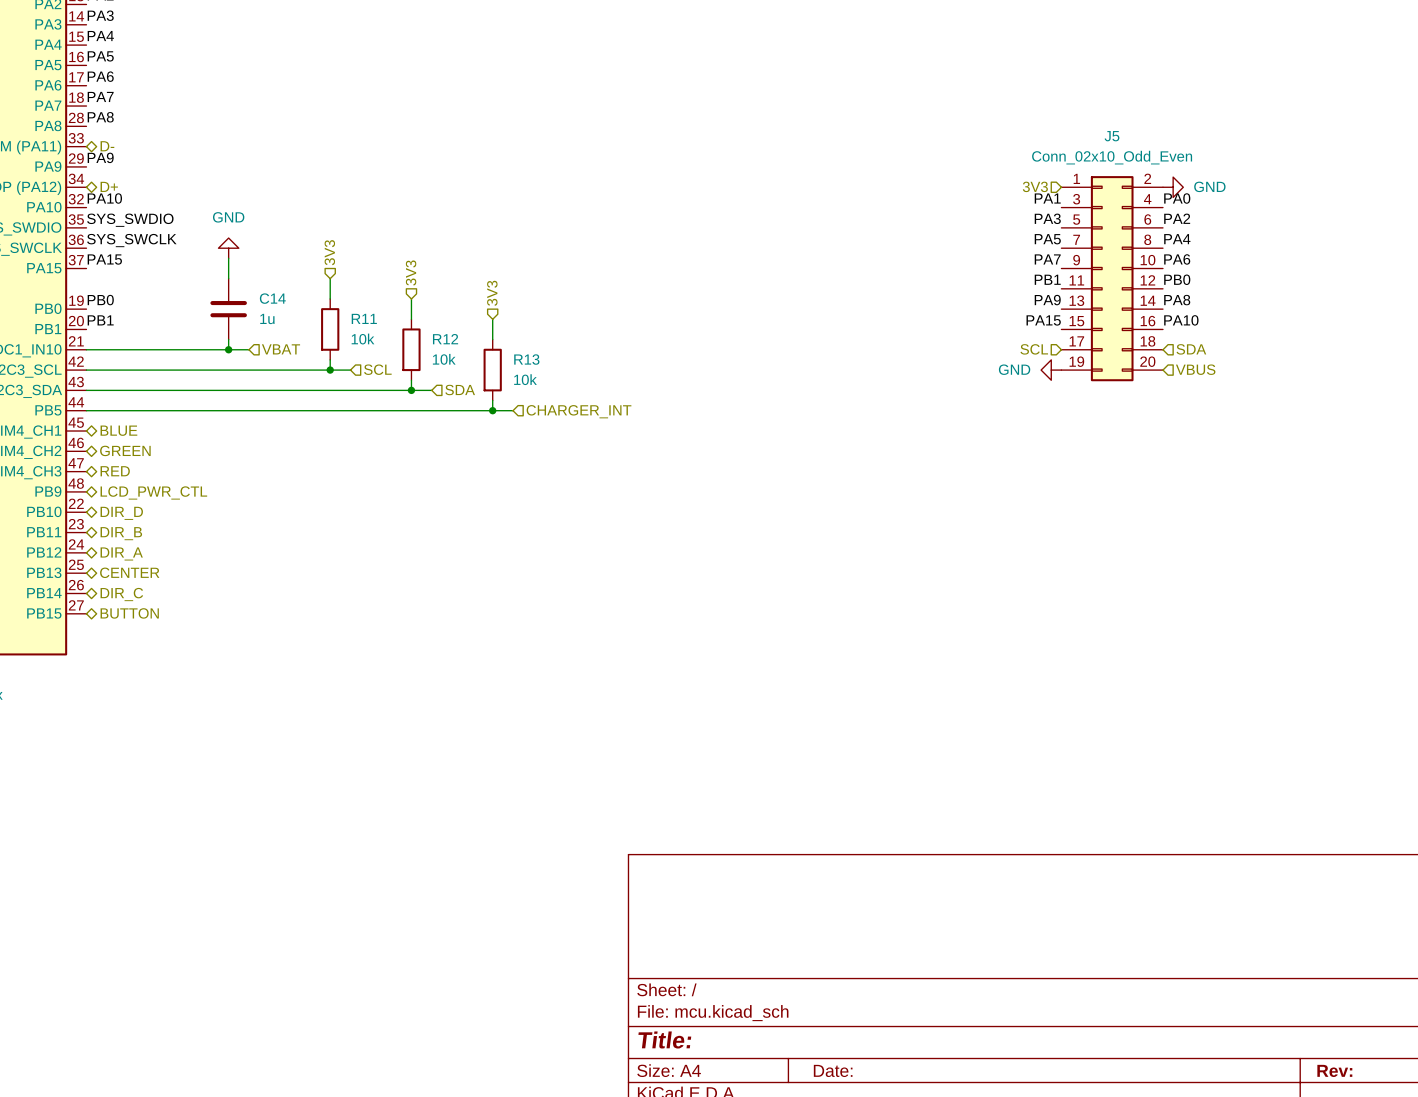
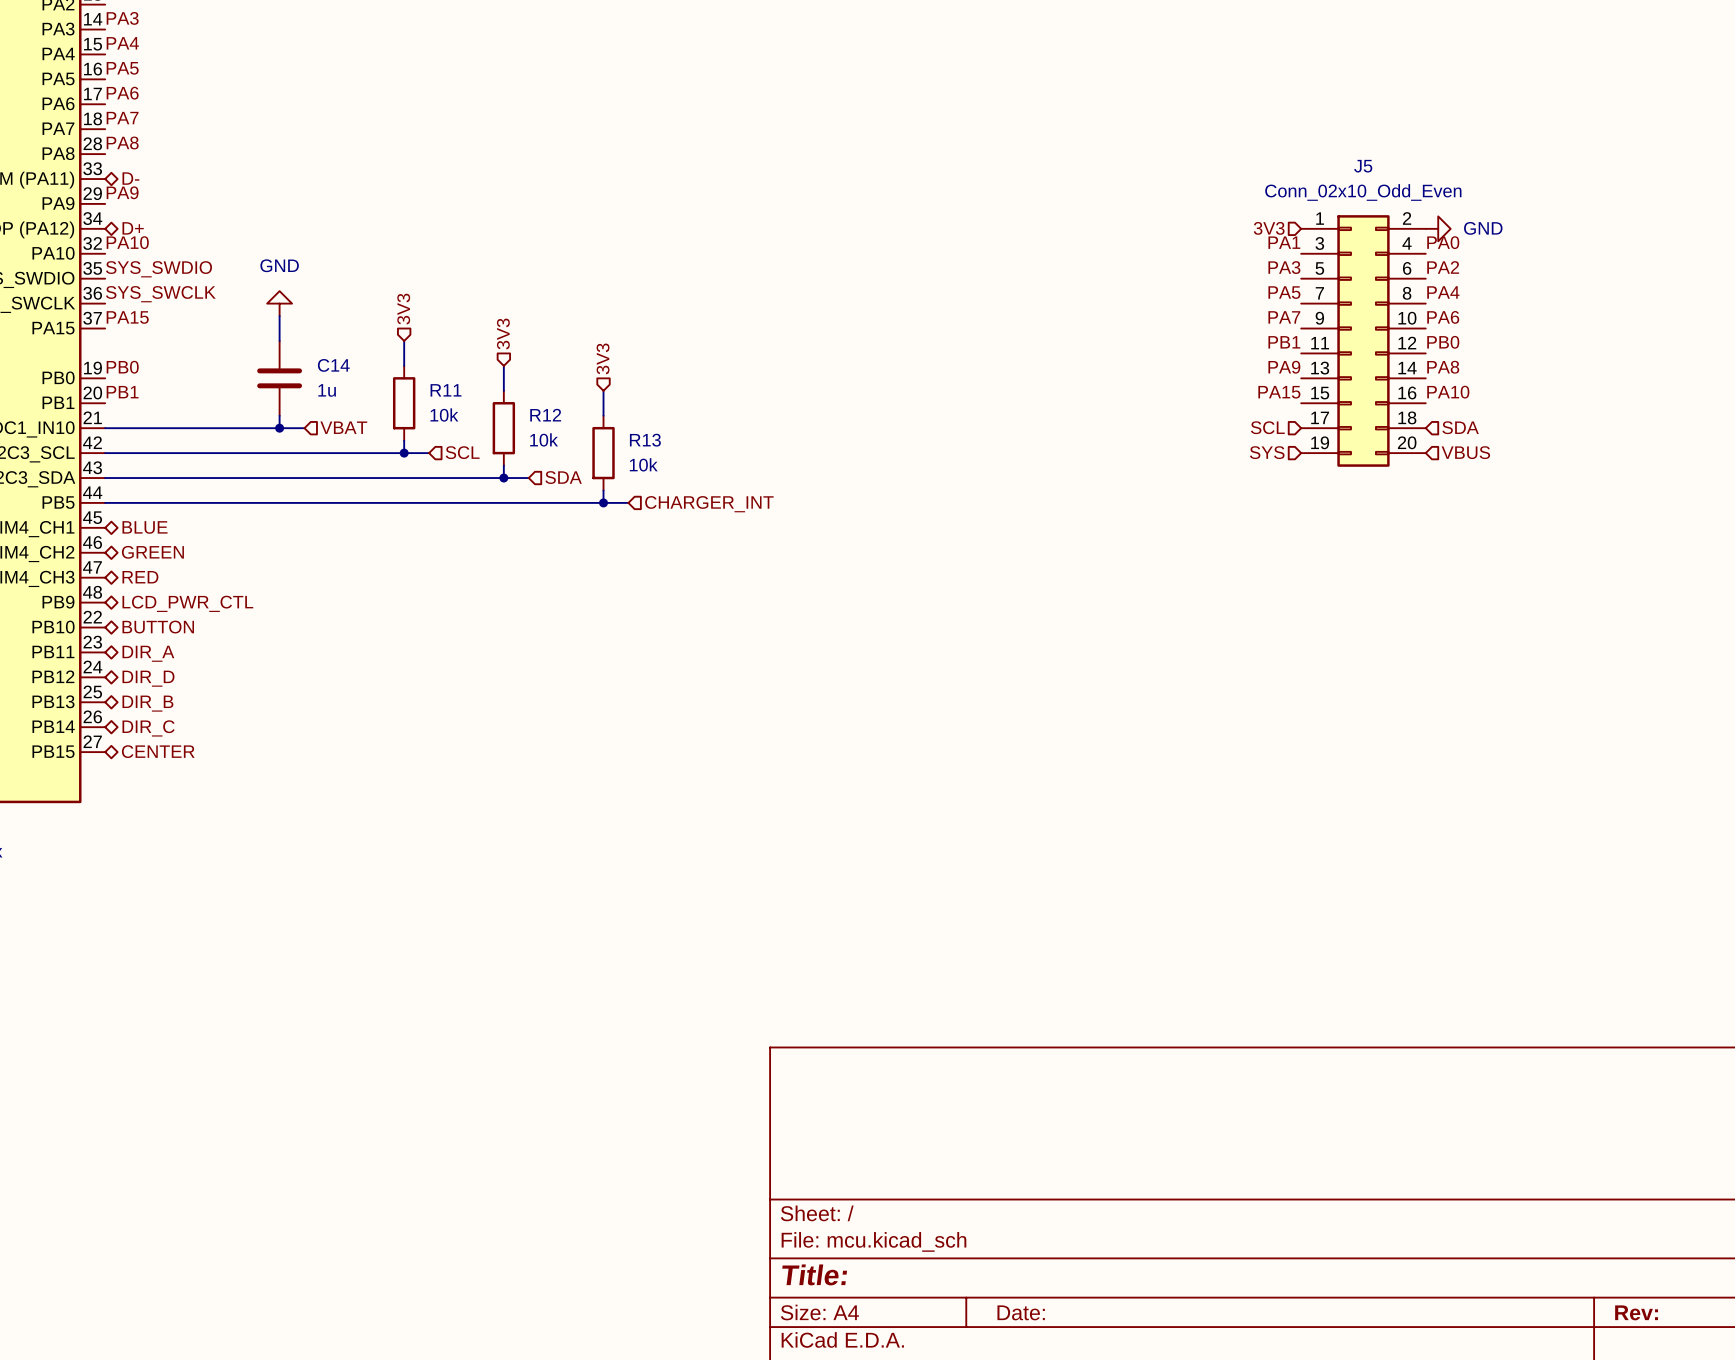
hierarchical label: none -> SYS (1267, 452)
power symbol: GND (1051, 370) -> none
hierarchical label: DIR_D (121, 513) -> BUTTON (158, 627)
hierarchical label: DIR_B (121, 533) -> DIR_A (148, 653)
hierarchical label: DIR_A (121, 553) -> DIR_D (148, 678)
hierarchical label: CENTER (129, 572) -> DIR_B (147, 703)
hierarchical label: BUTTON (129, 613) -> CENTER (158, 751)

